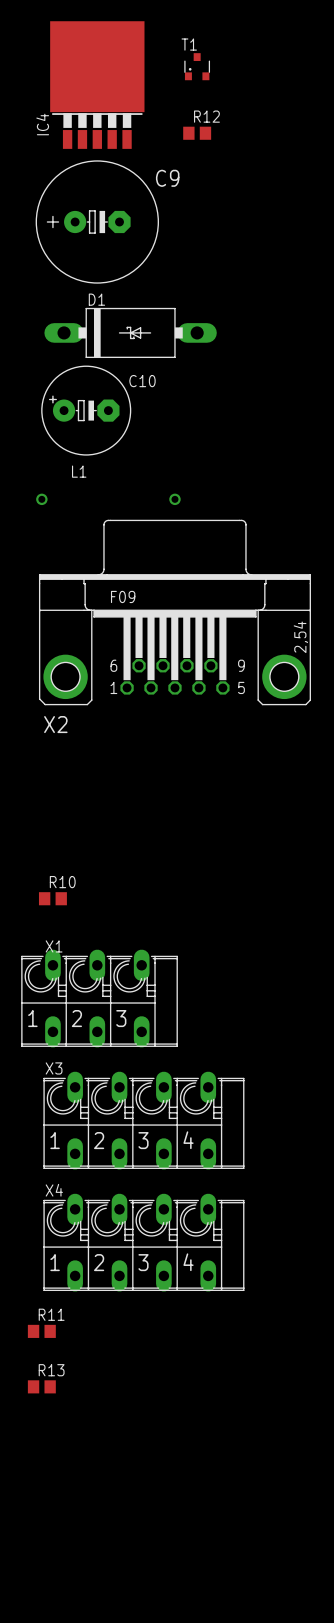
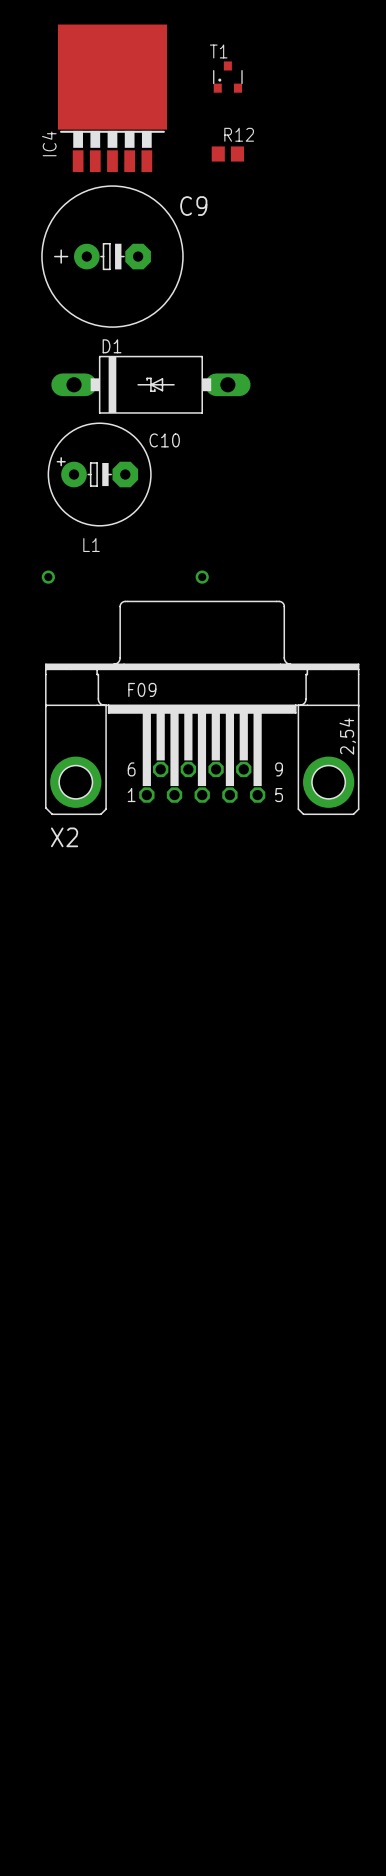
R10: (52, 898) -> none
X1: (99, 998) -> none
X3: (143, 1120) -> none
X4: (143, 1242) -> none
R11: (41, 1331) -> none
R13: (41, 1386) -> none

